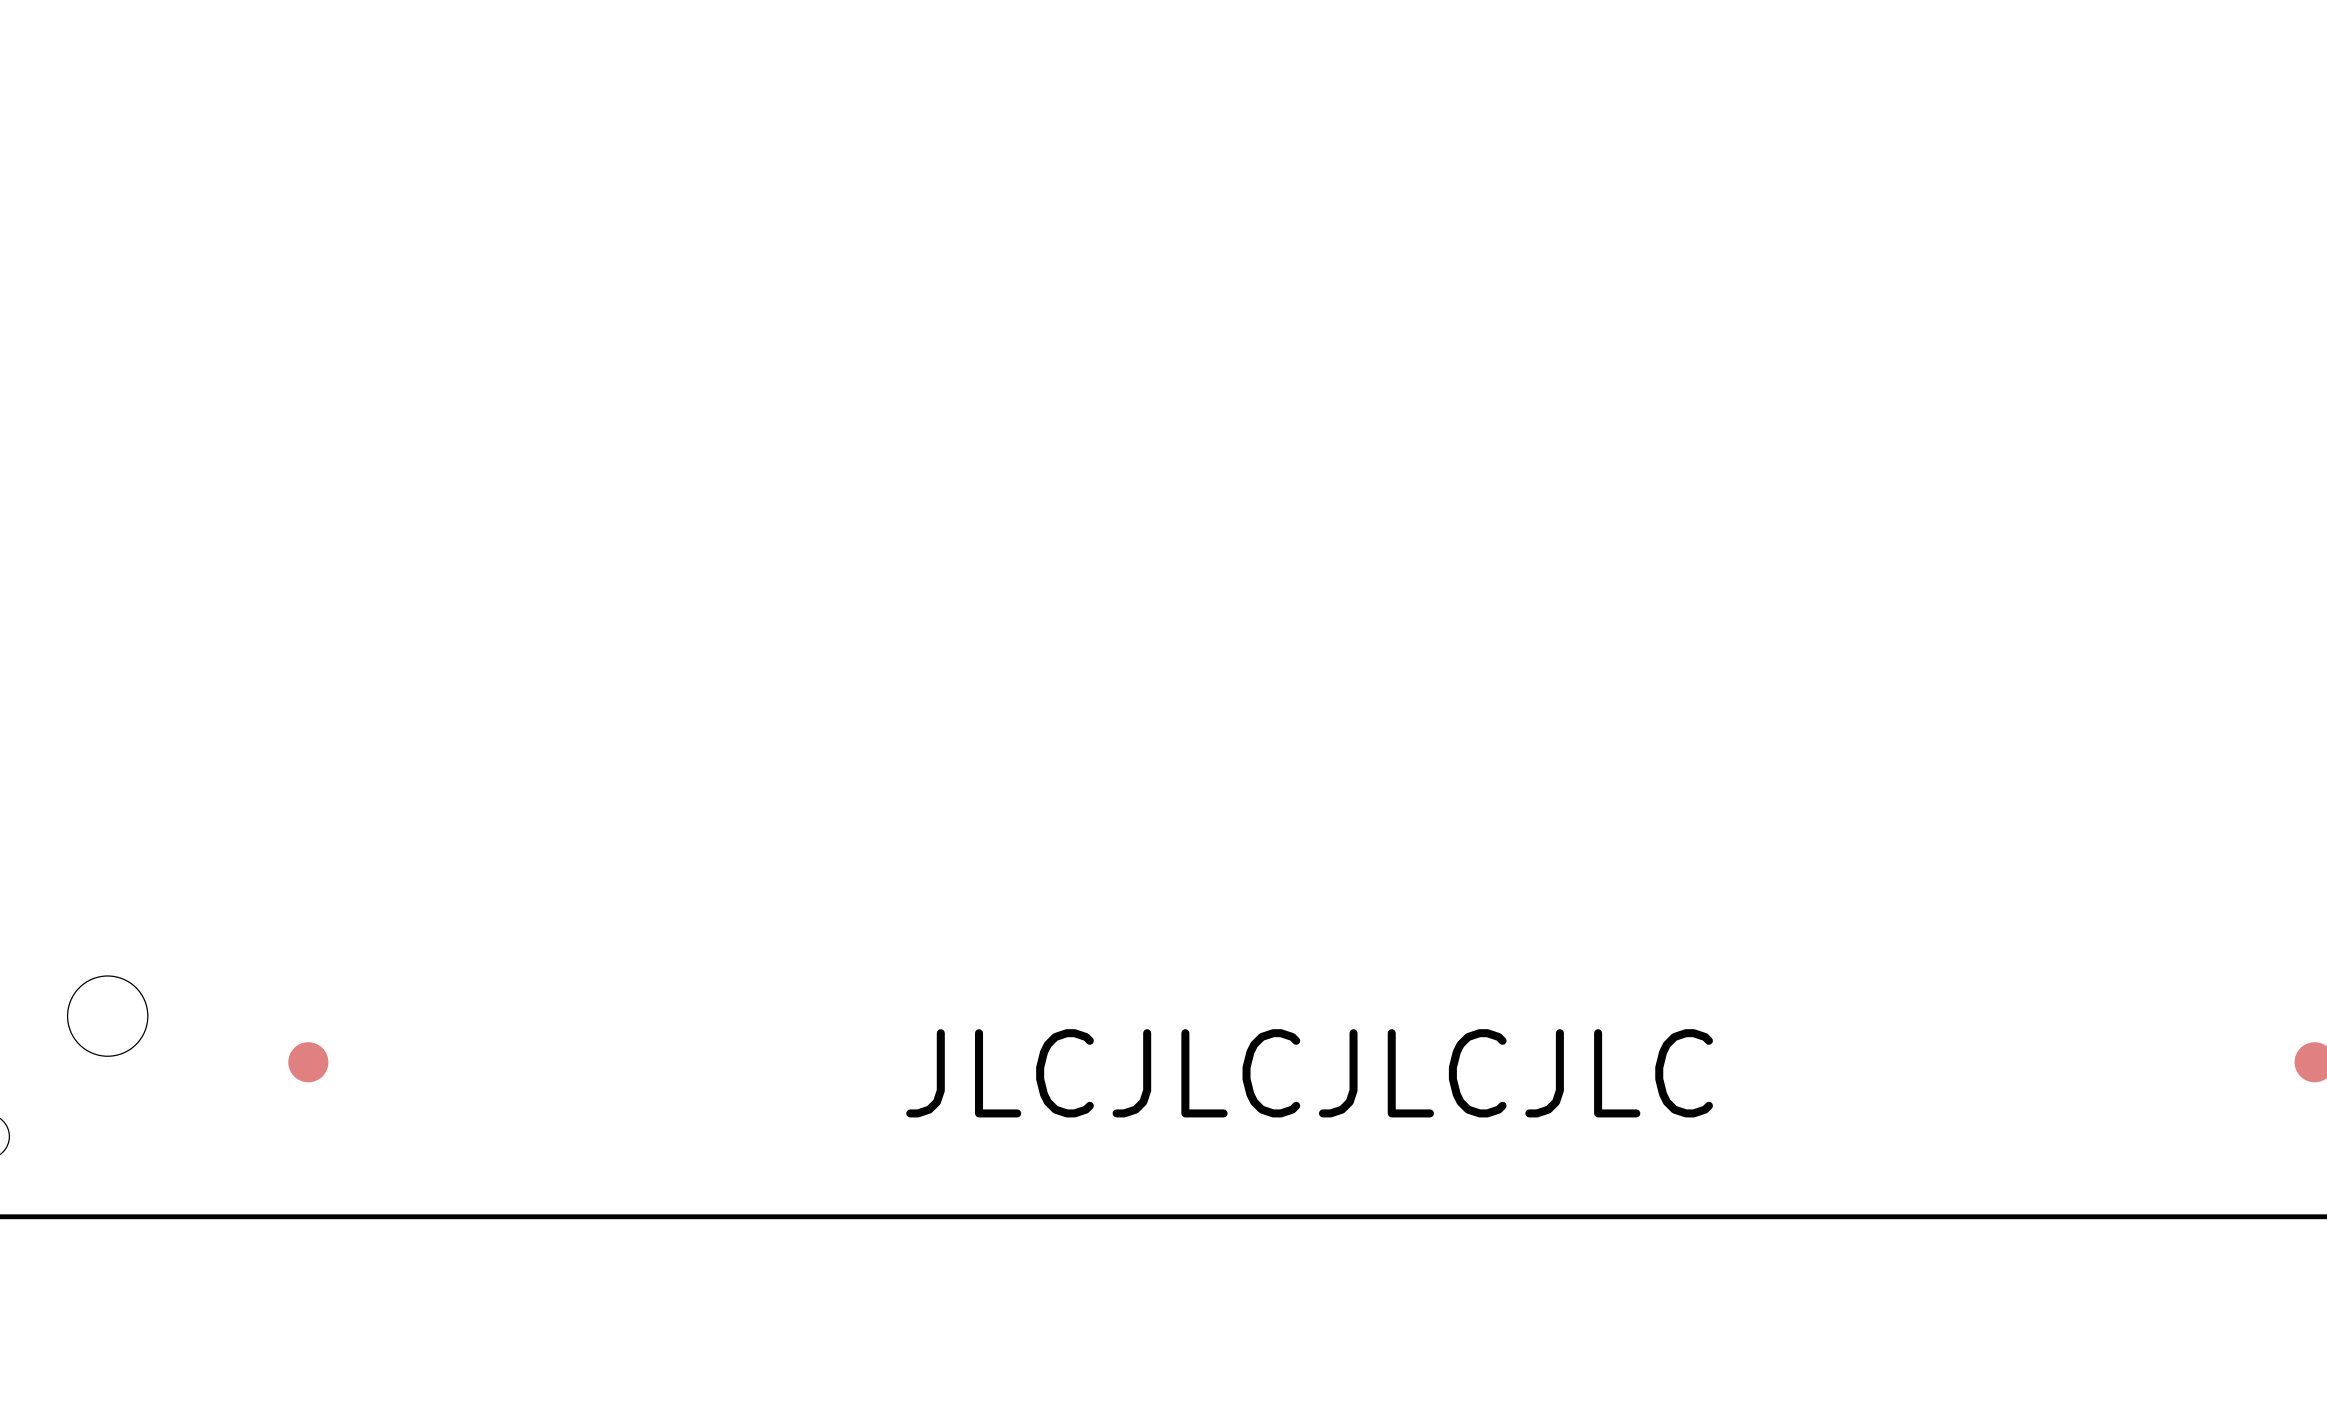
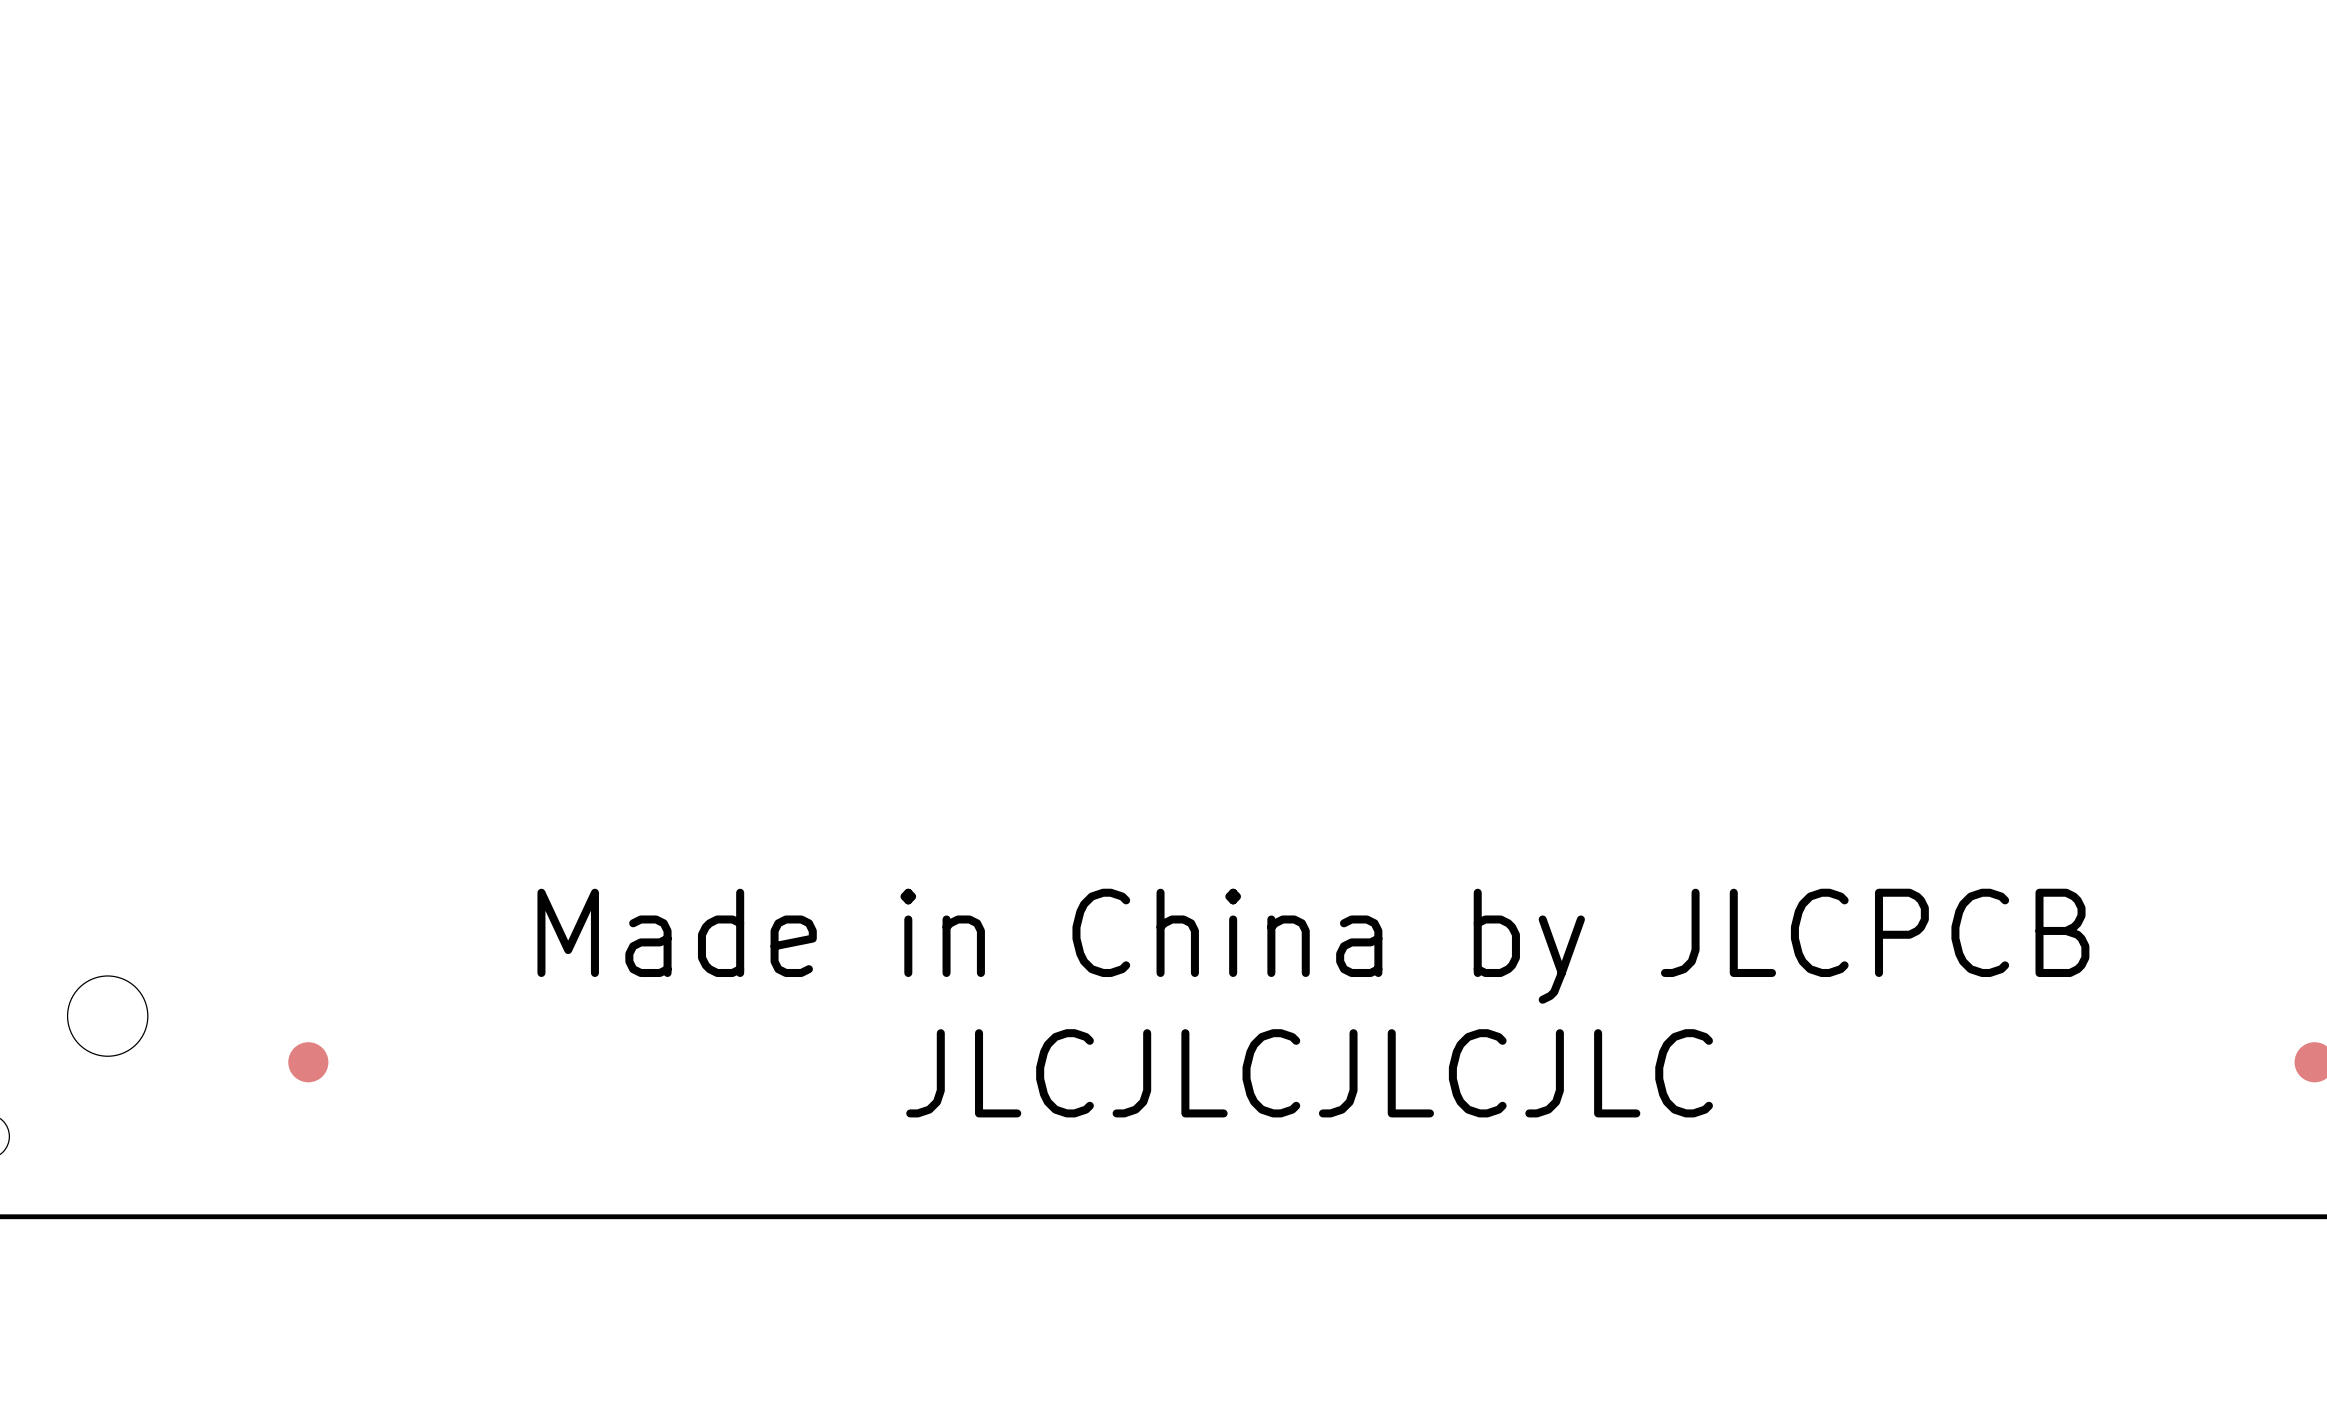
text: none -> Made in China by JLCPCB (1313, 946)

